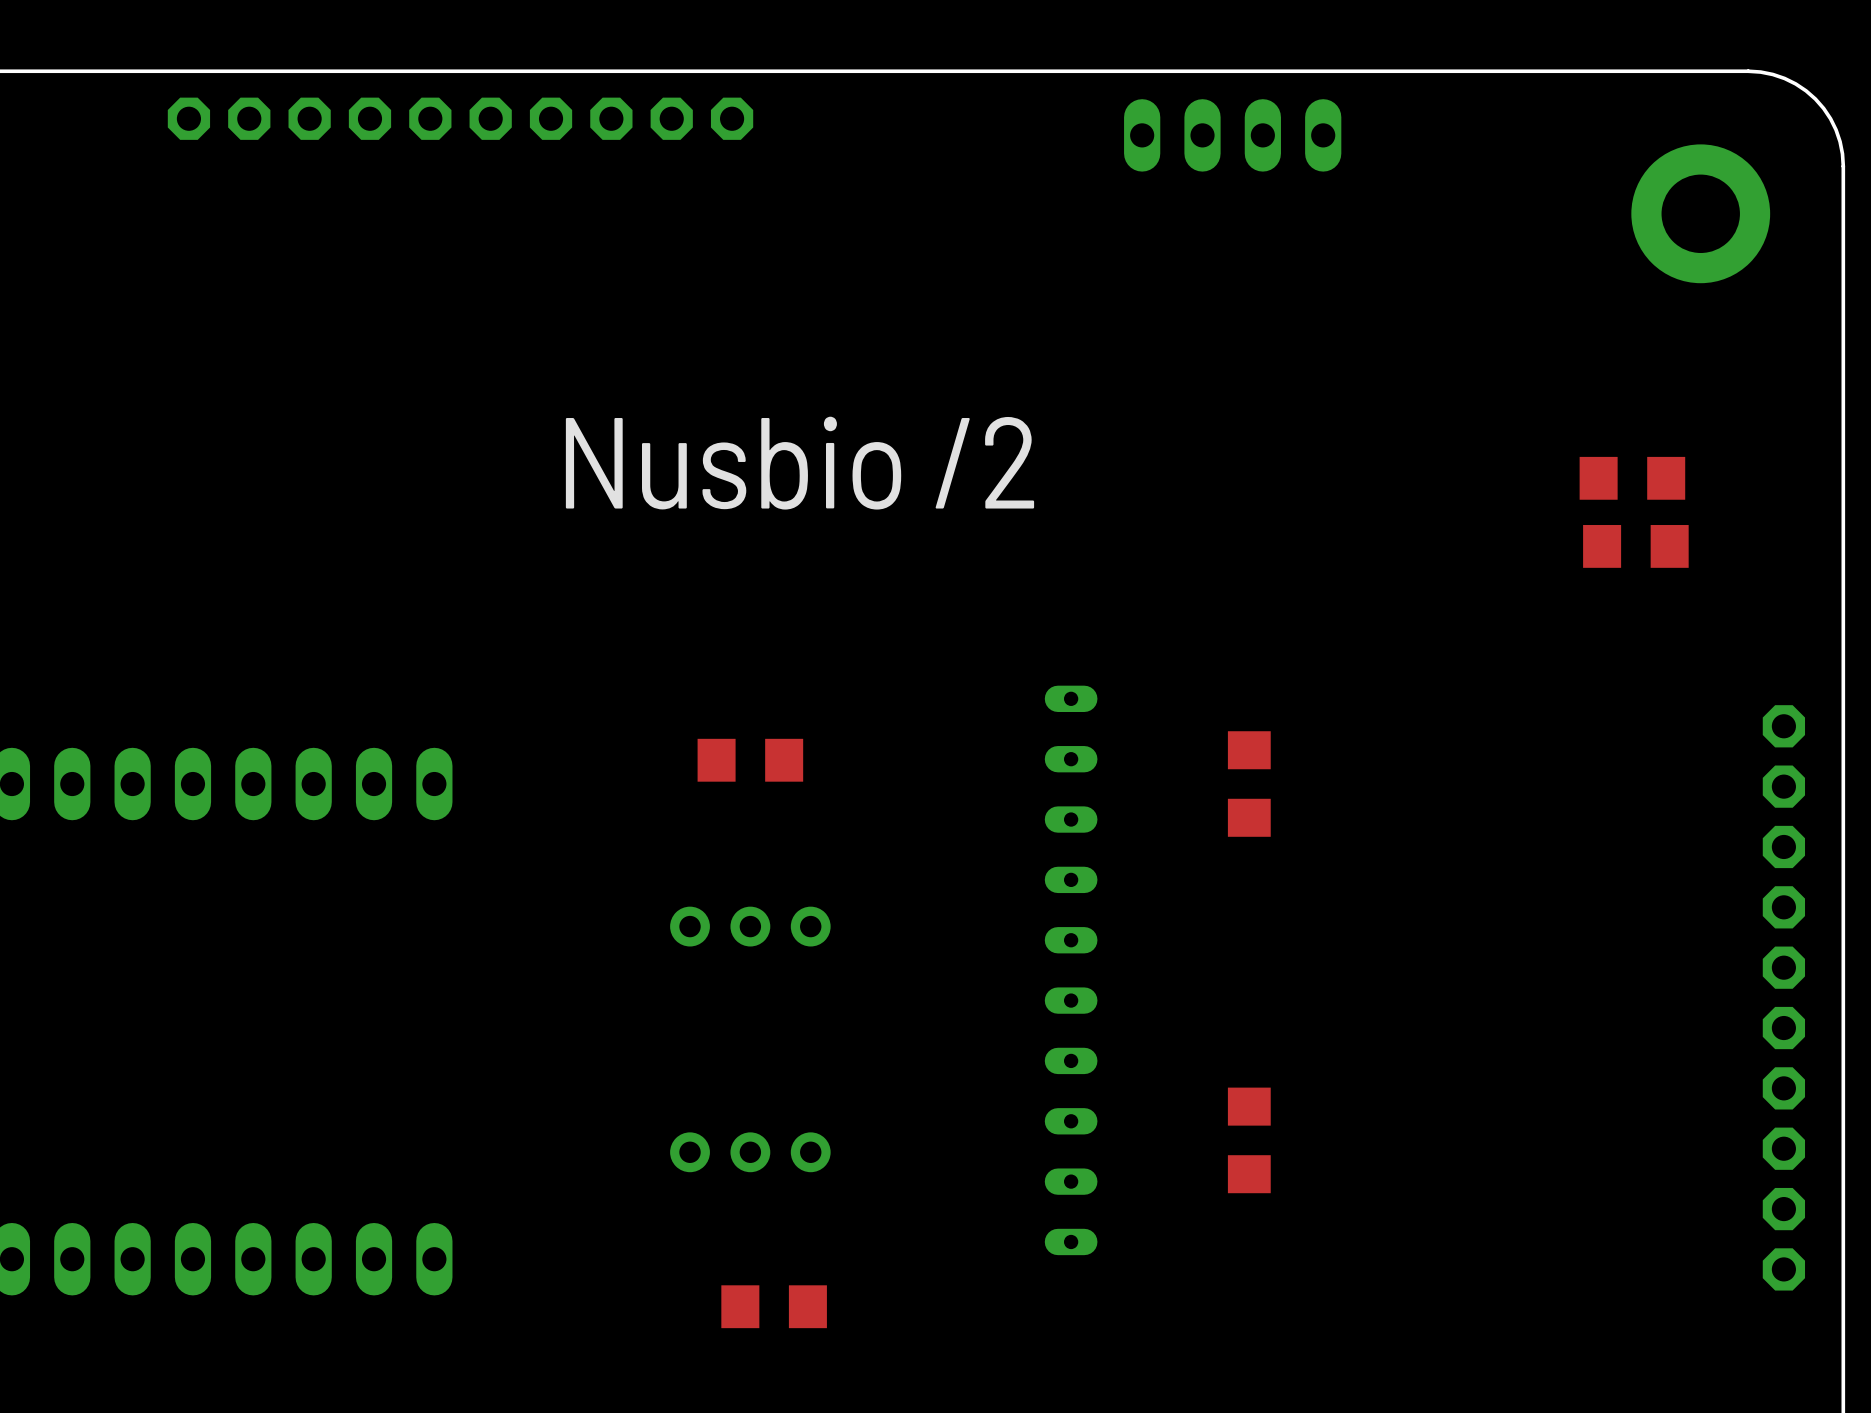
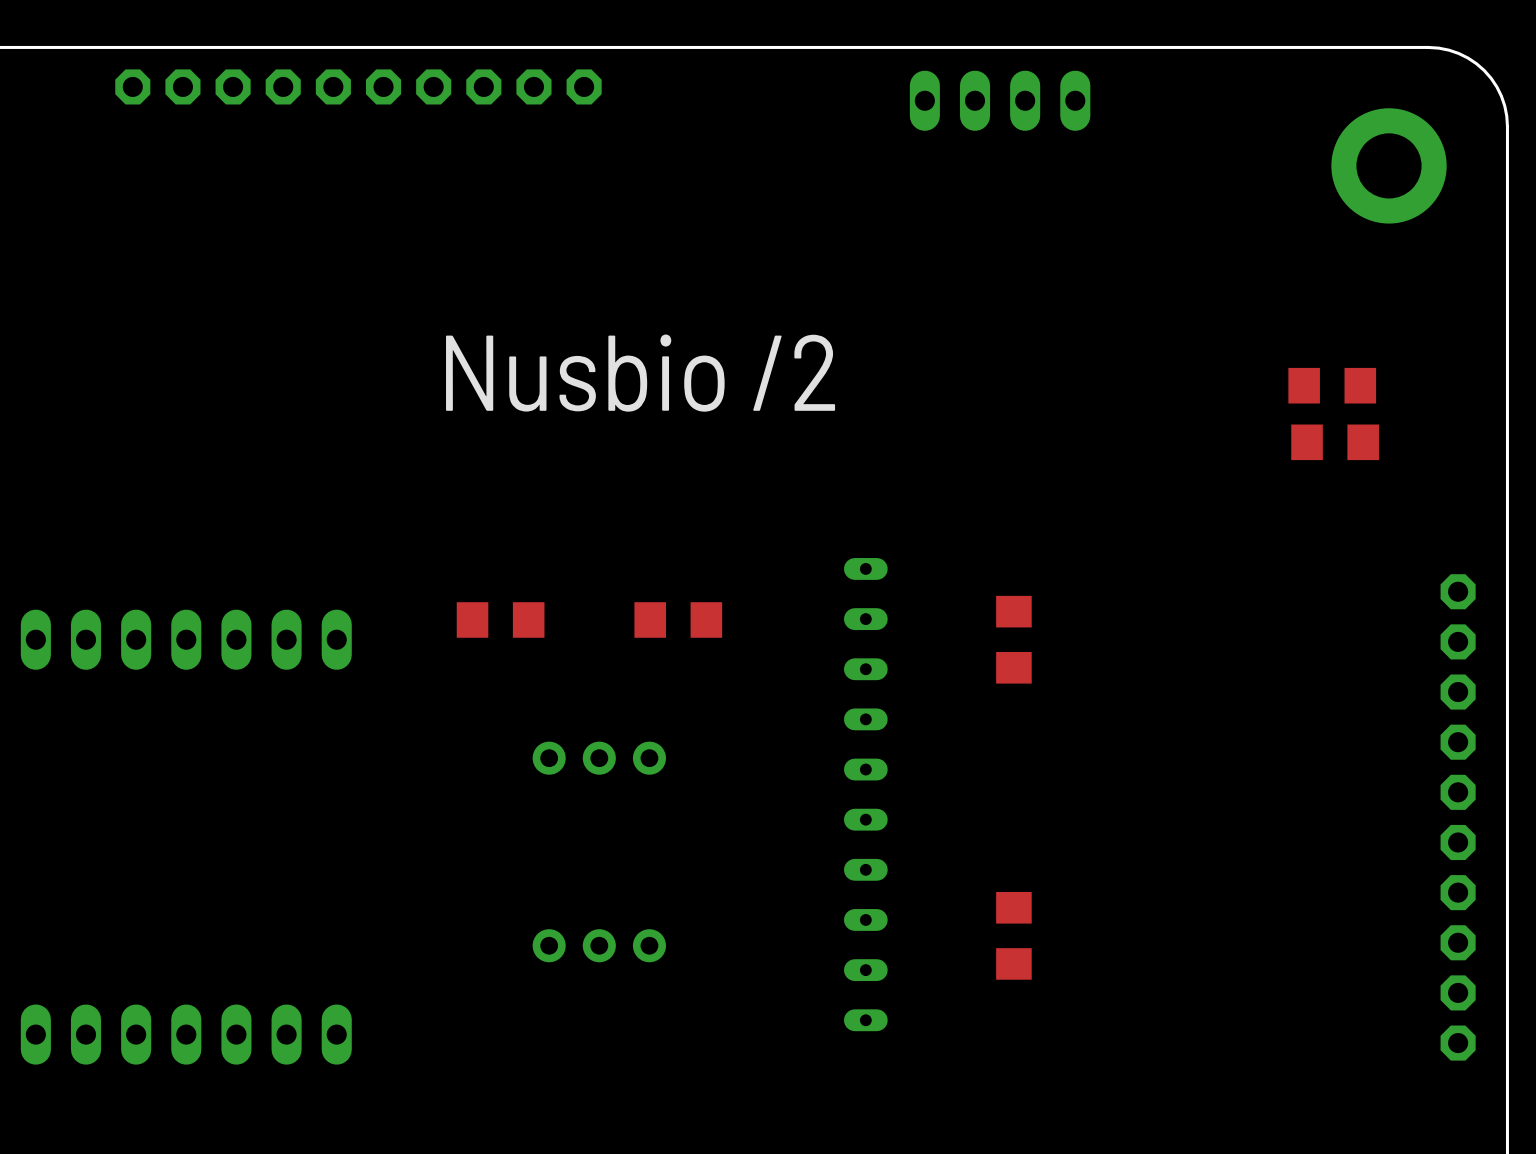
part: none -> (500, 619)
part: (750, 760) -> none
part: none -> (678, 619)
part: (774, 1306) -> none

